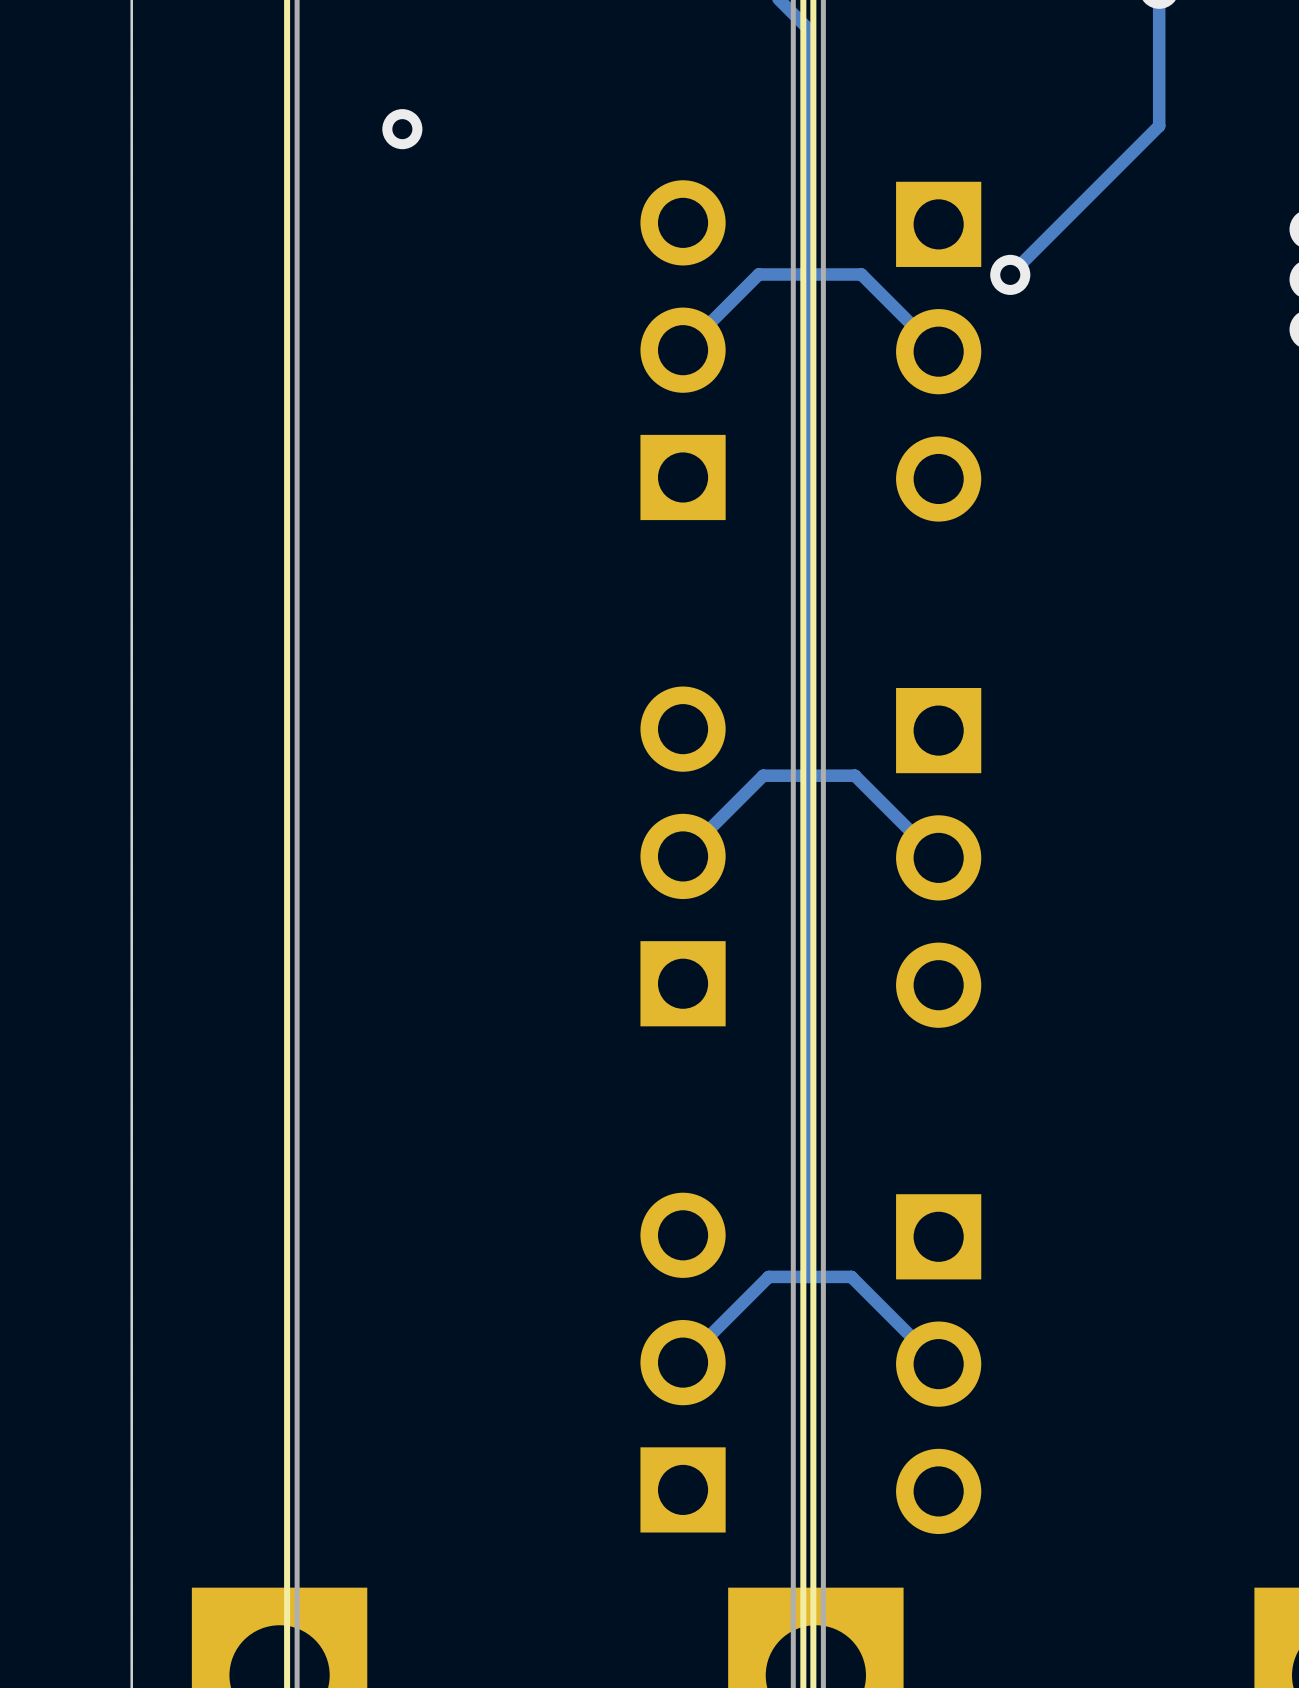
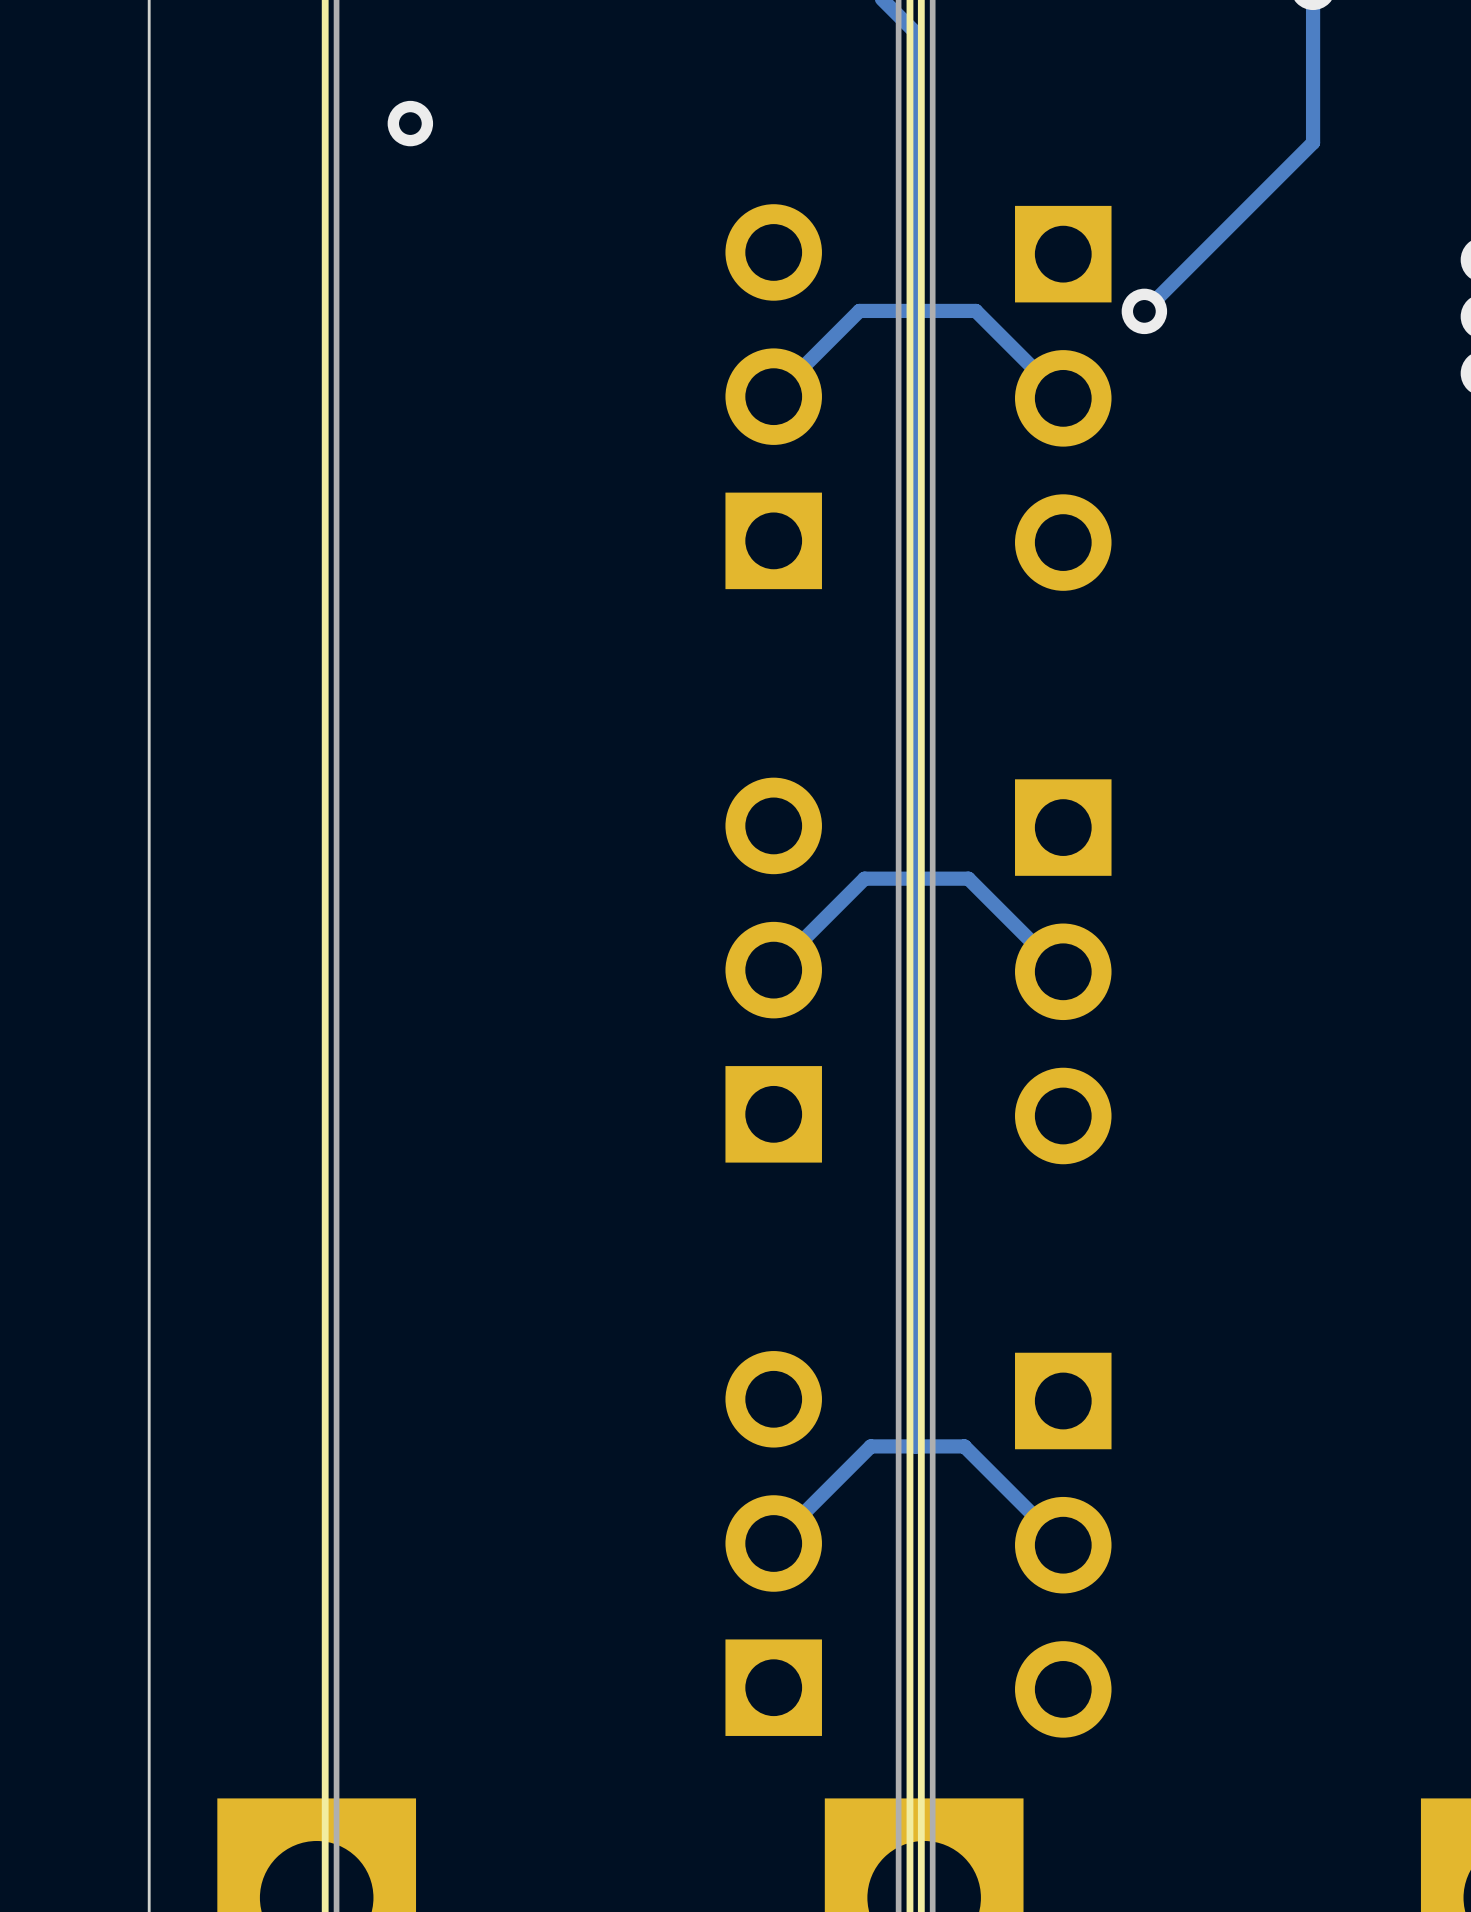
via position: (402, 129) -> (410, 123)

